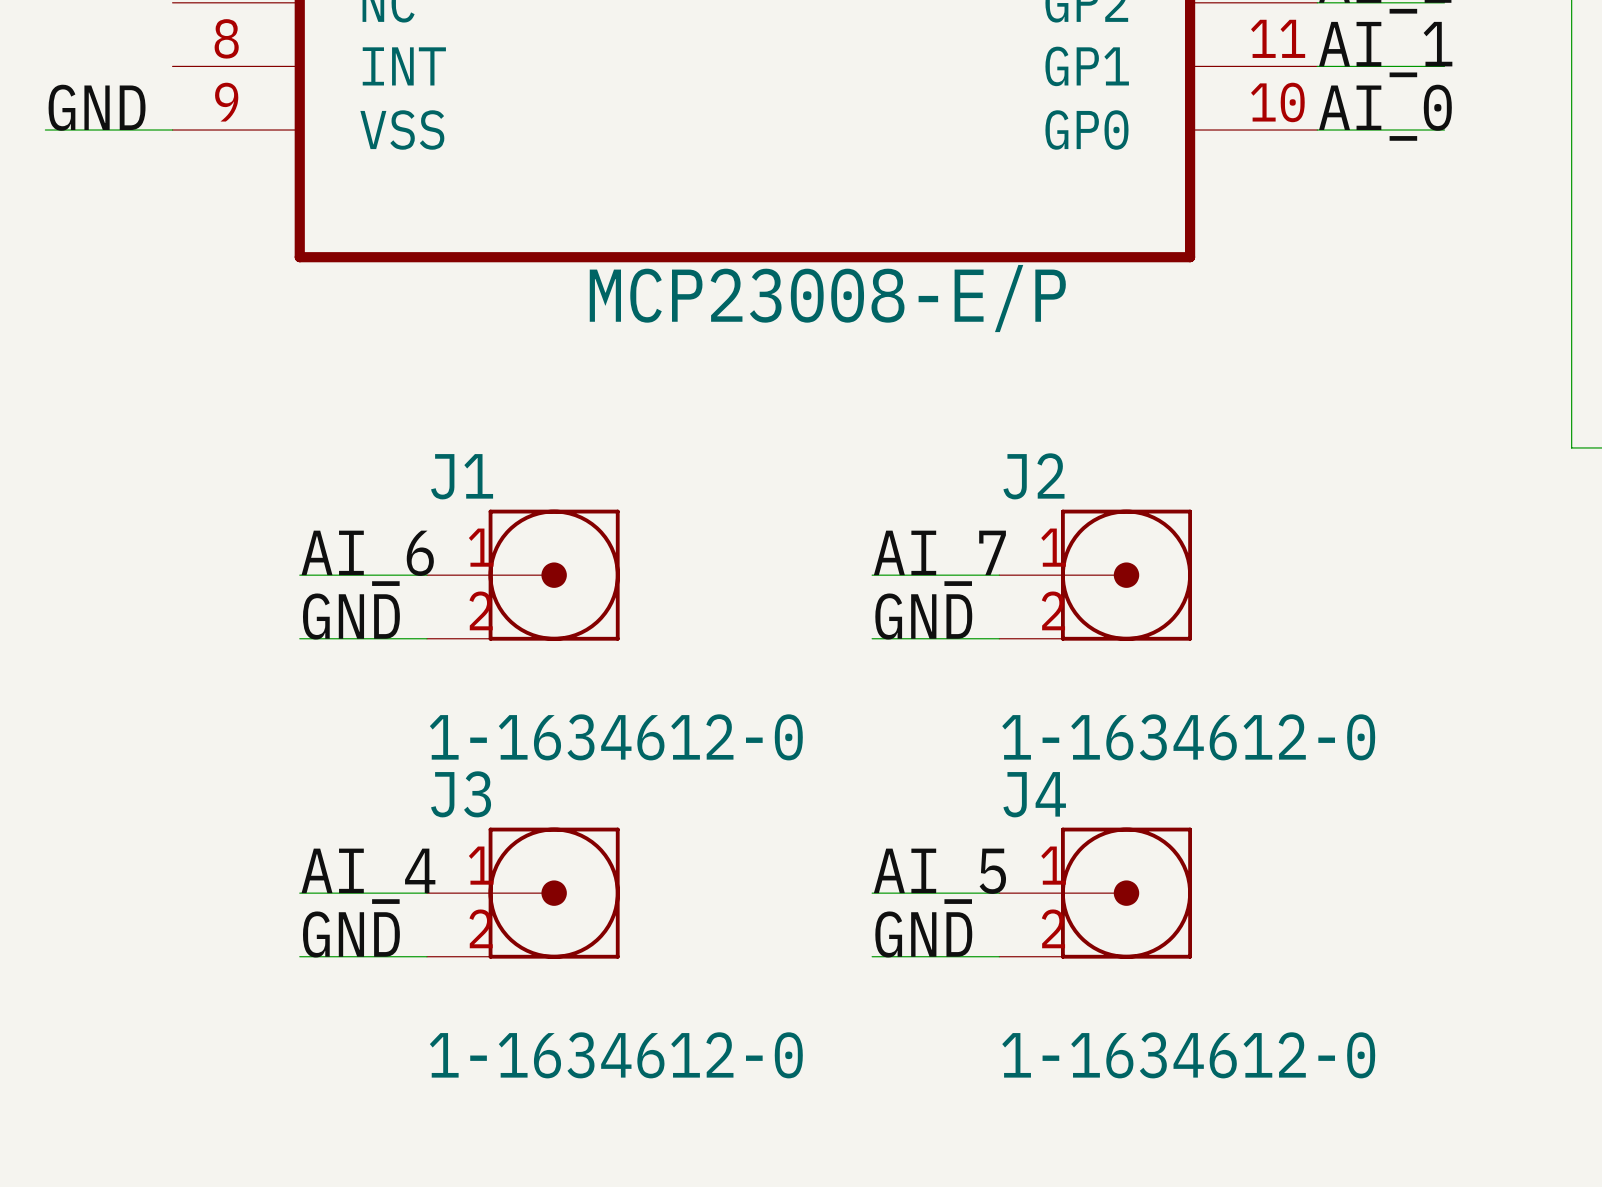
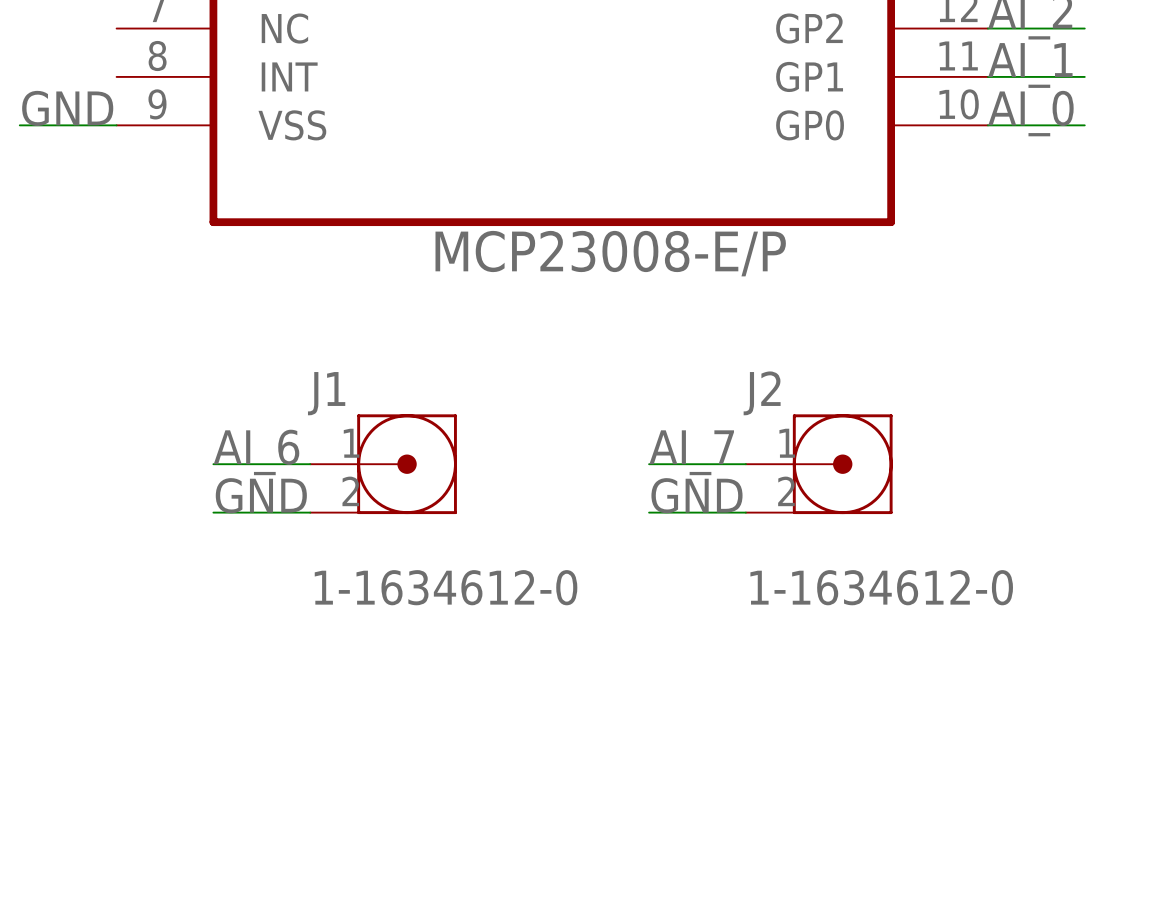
label: AI_4 (368, 876) -> none
label: AI_5 (939, 876) -> none
wire: (299, 893) (426, 893) -> none
J3: 1-1634612-0 (523, 893) -> none
wire: (872, 893) (999, 893) -> none
J4: 1-1634612-0 (1095, 893) -> none
label: GND (351, 934) -> none
label: GND (923, 934) -> none
wire: (299, 956) (426, 956) -> none
wire: (872, 956) (999, 956) -> none

